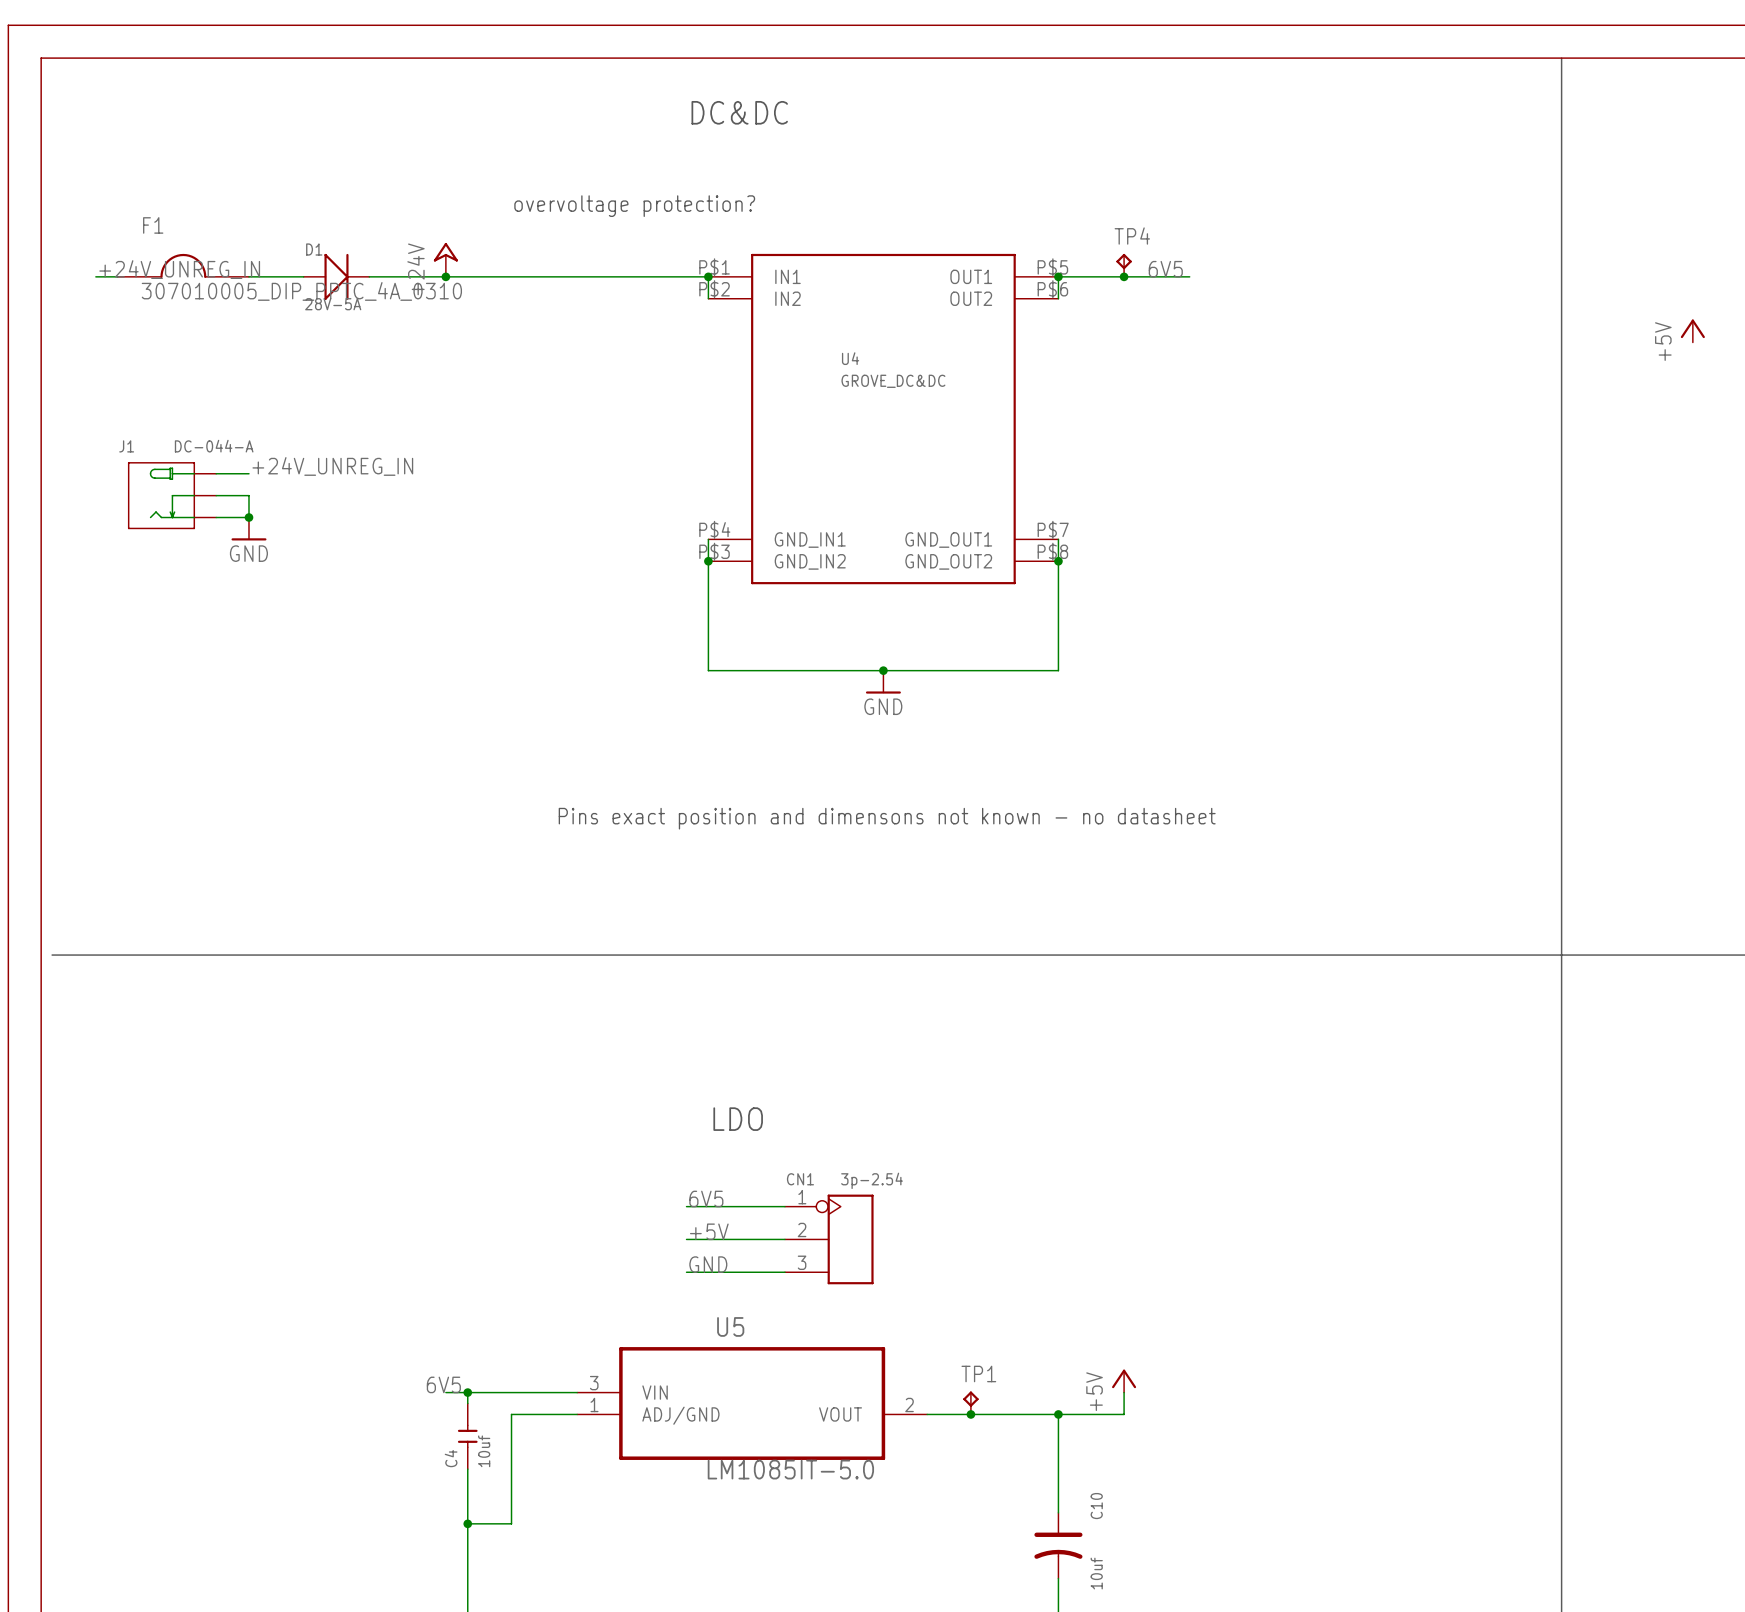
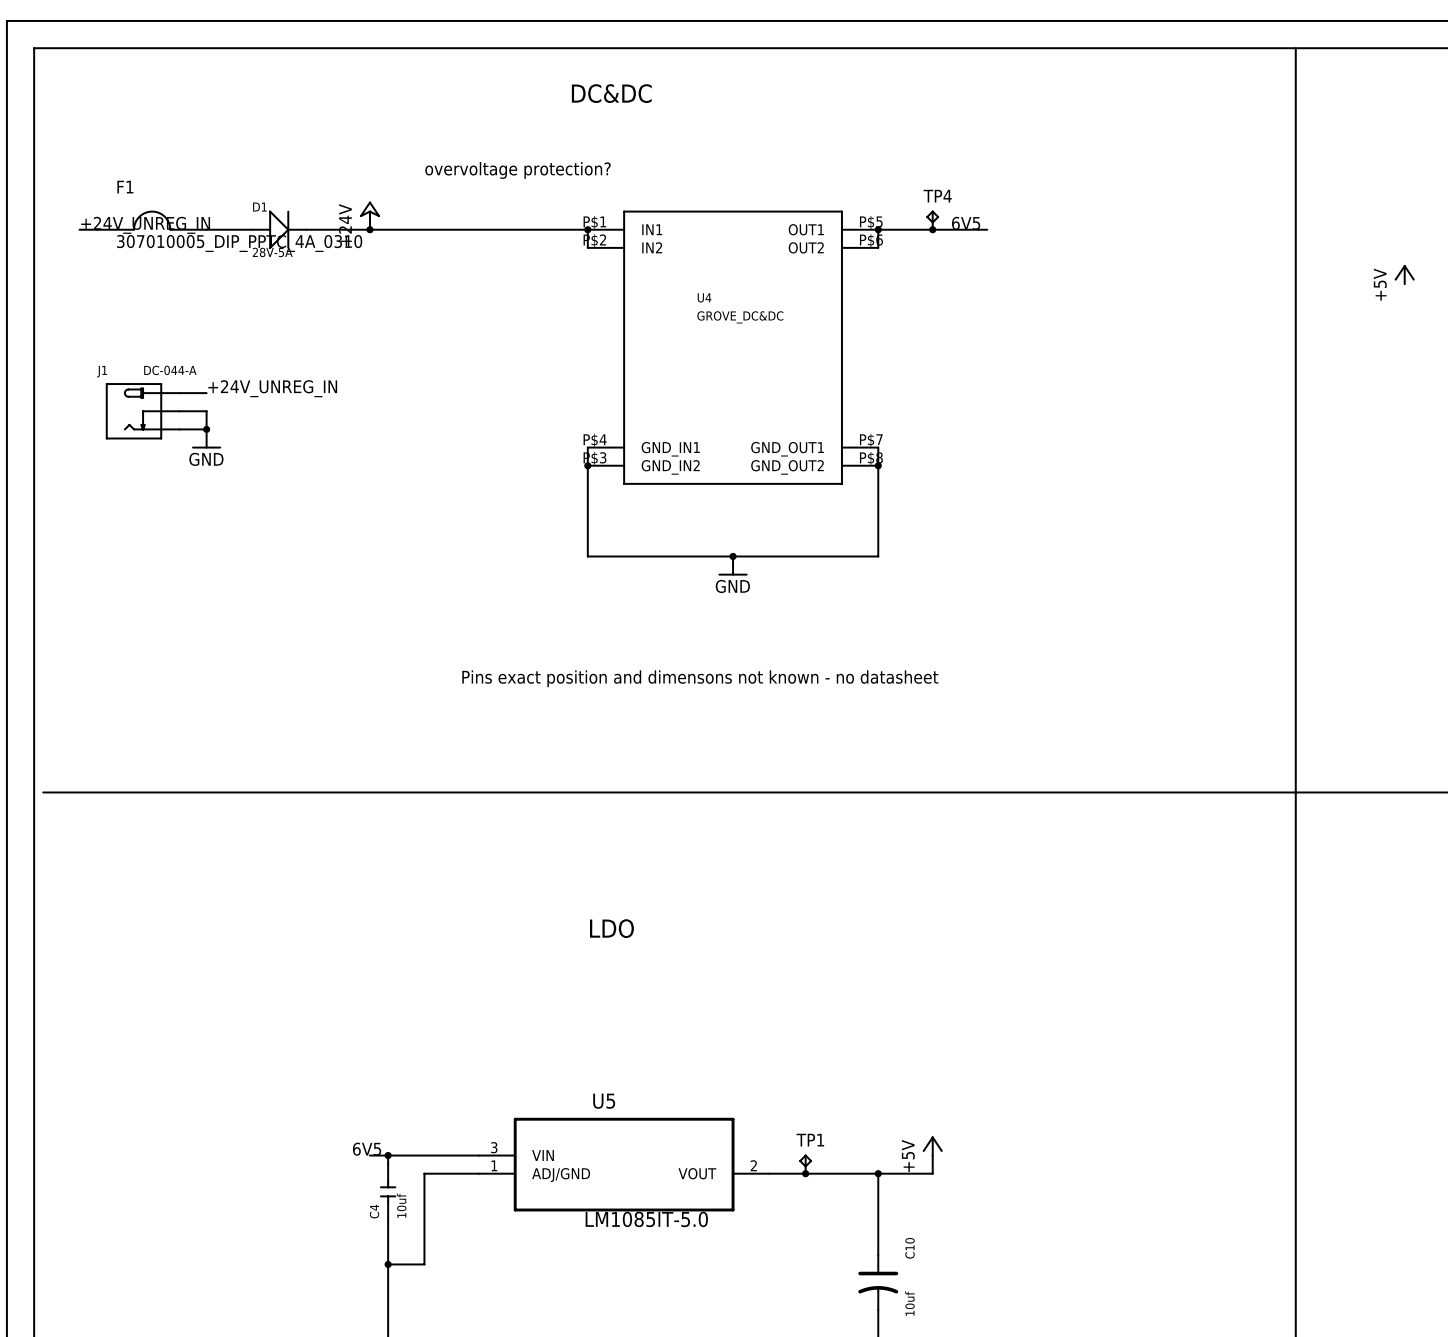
label: 6V5 (706, 1198) -> none
wire: (686, 1206) (784, 1206) -> none
label: +5V (709, 1231) -> none
wire: (686, 1239) (784, 1239) -> none
CN1: 3p-2.54 (829, 1239) -> none
label: GND (708, 1264) -> none
wire: (686, 1272) (784, 1272) -> none

